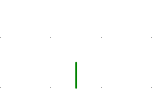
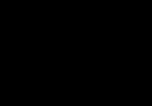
wire: (76, 62) (76, 87) -> none

